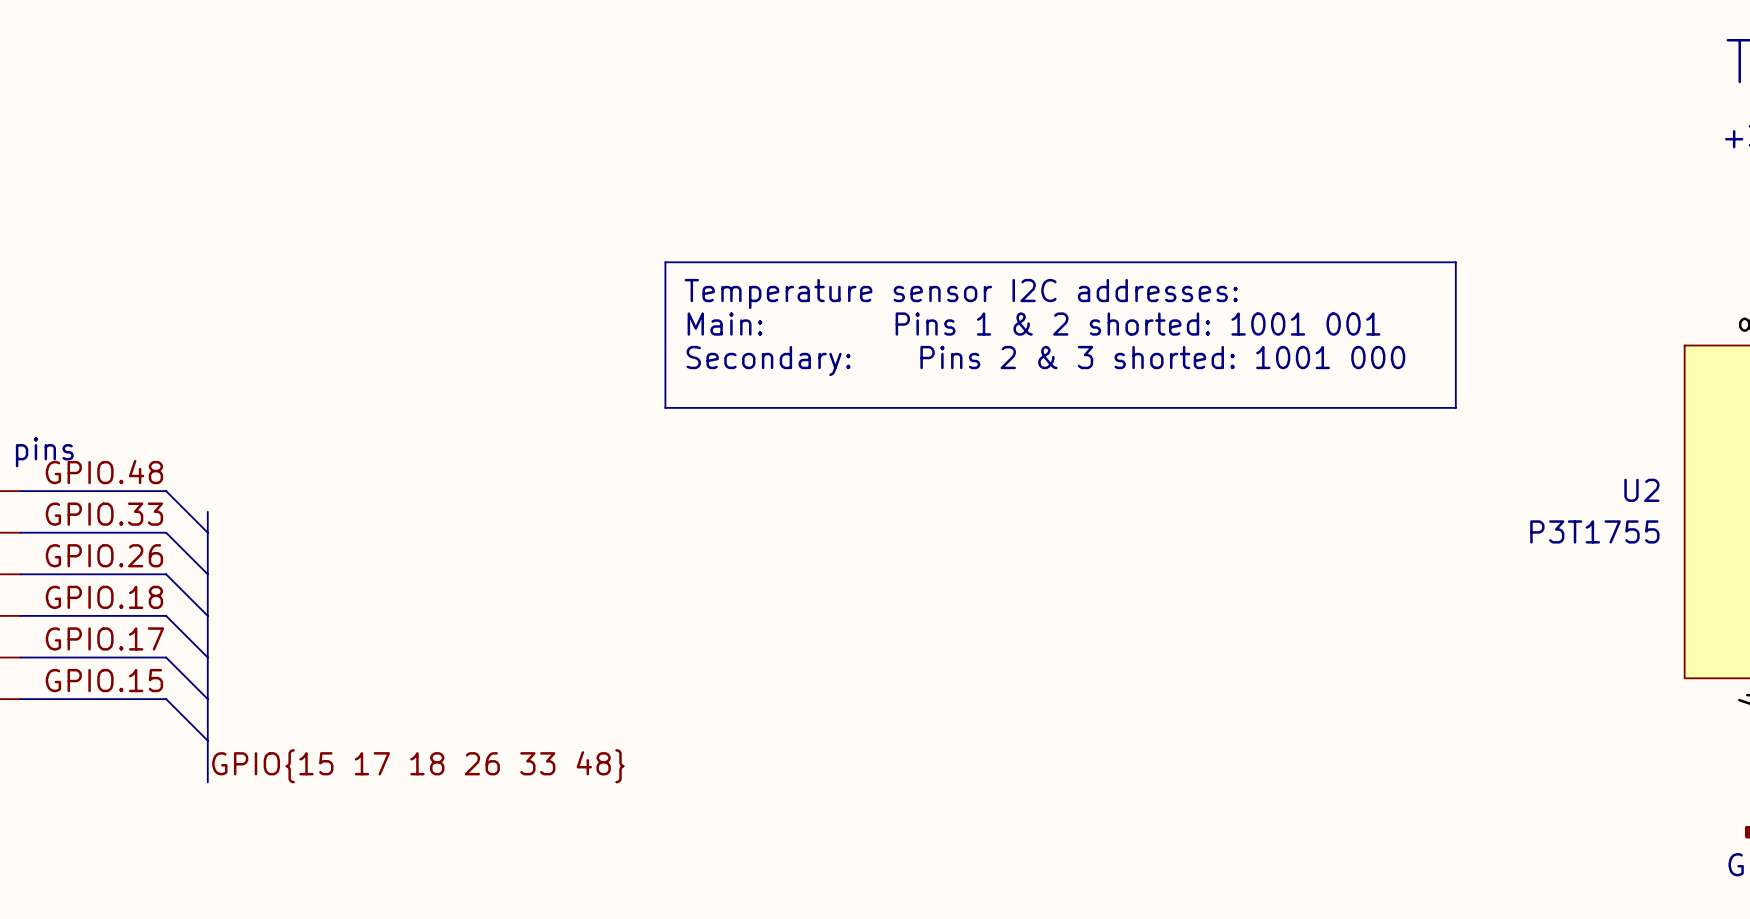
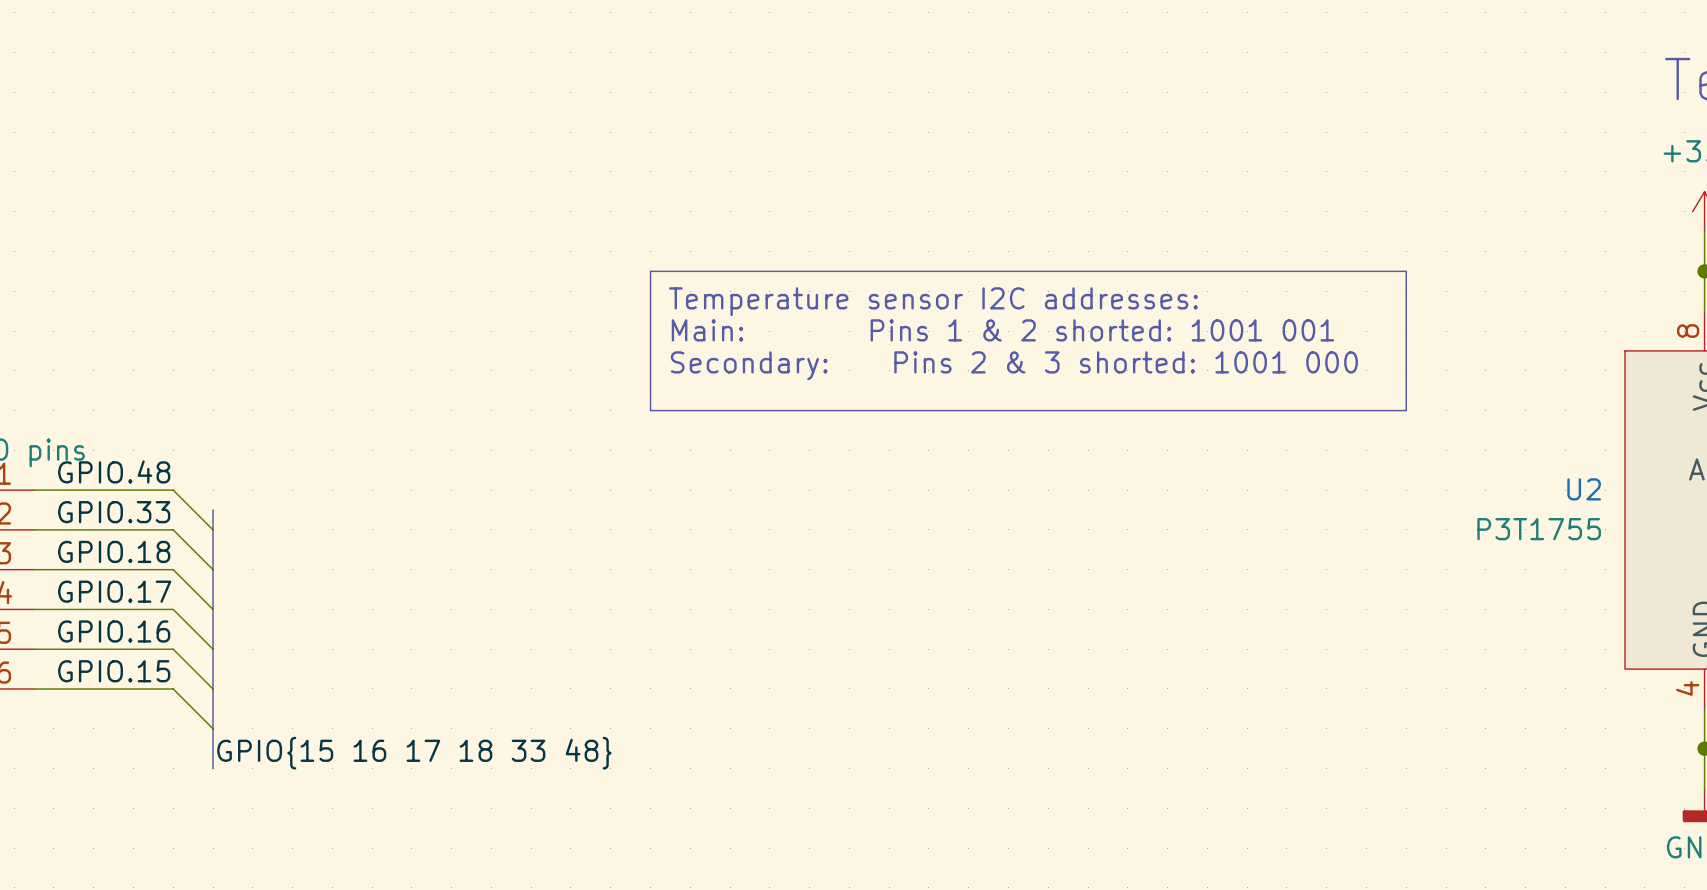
label: GPIO.26 (104, 555) -> GPIO.18 (114, 551)
label: GPIO.18 (104, 597) -> GPIO.17 (114, 591)
label: GPIO.17 (104, 638) -> GPIO.16 (114, 631)
label: GPIO{15 17 18 26 33 48} (418, 766) -> GPIO{15 16 17 18 33 48} (414, 753)

